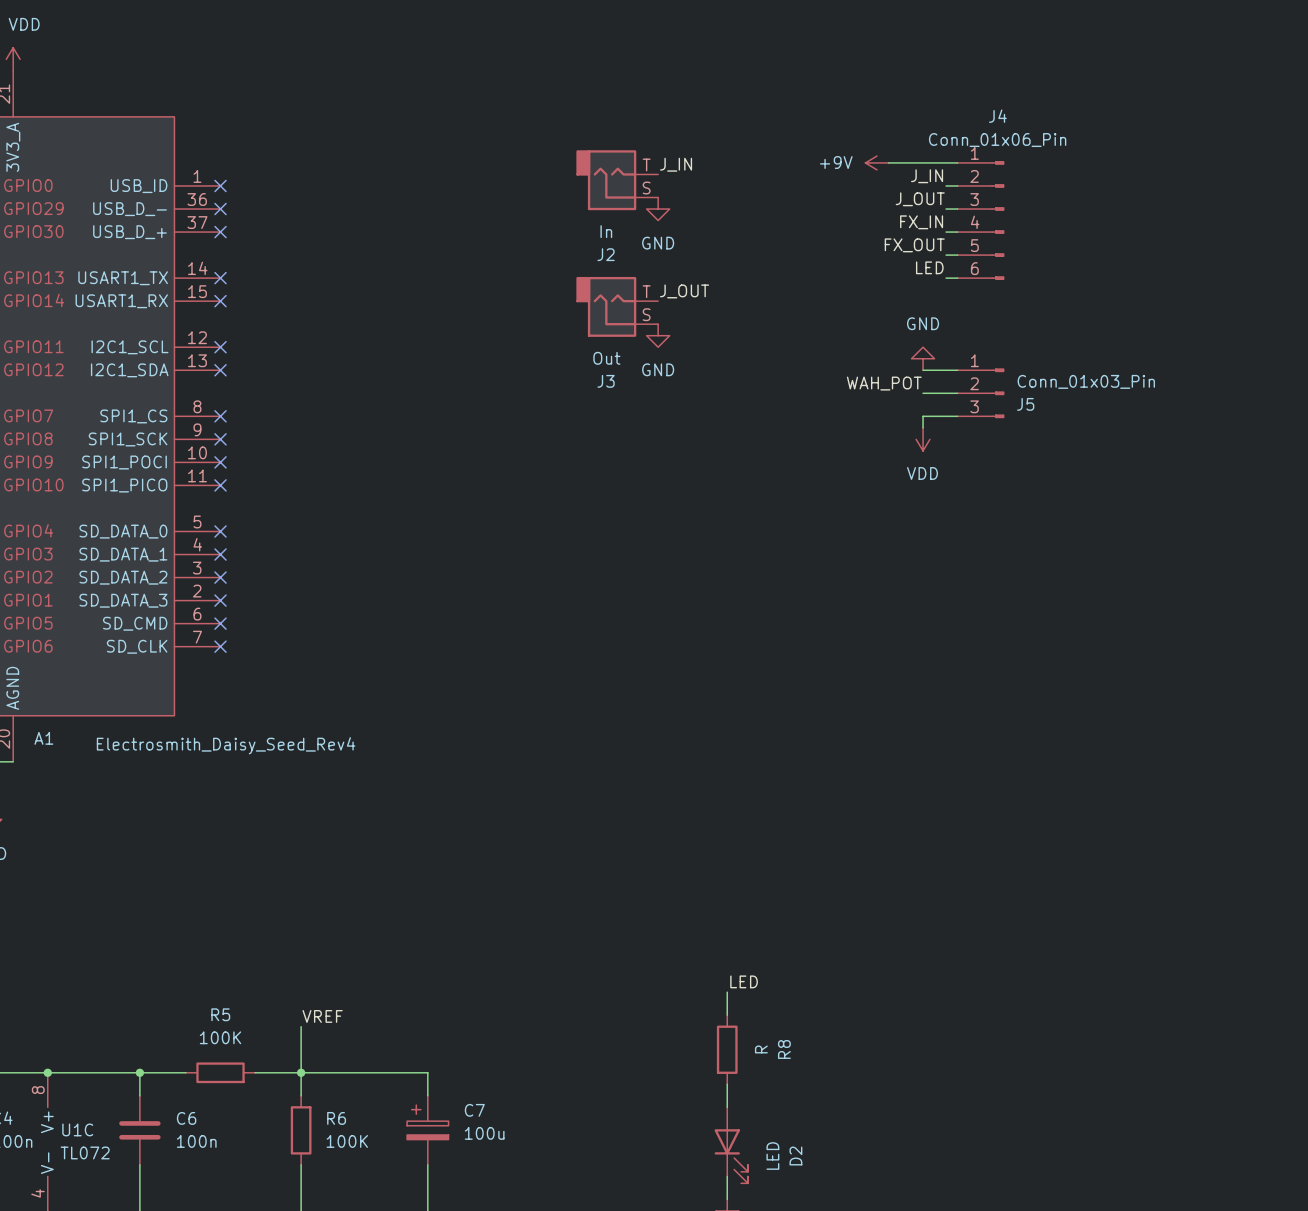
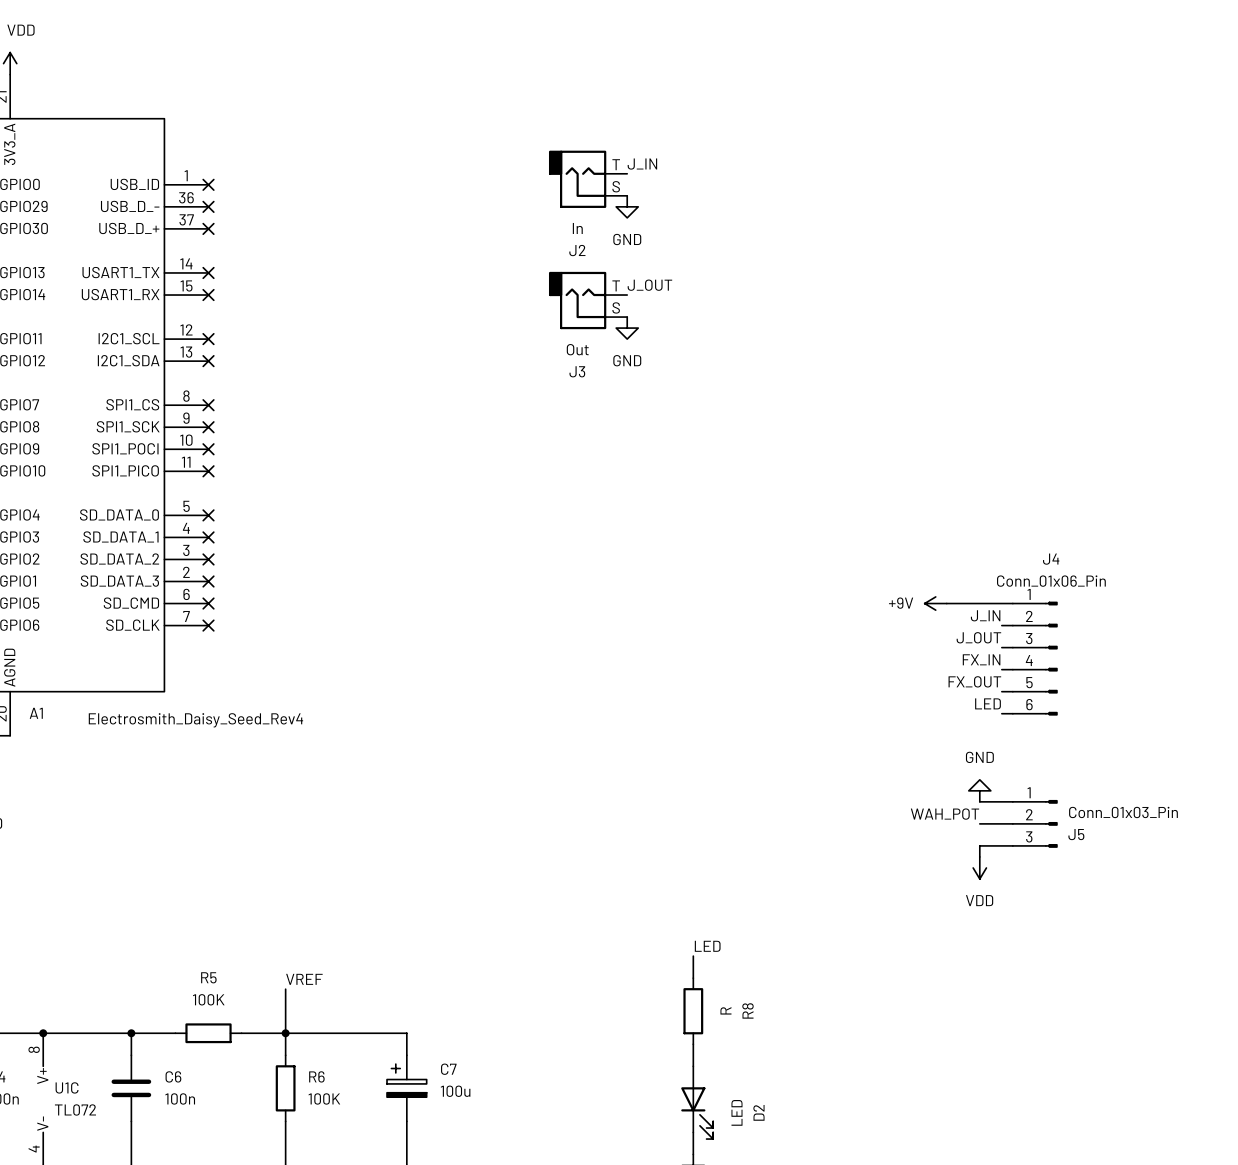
power symbol: +9V (876, 162) -> none
wire: (888, 162) (957, 162) -> none
label: J_IN (927, 176) -> none
wire: (946, 185) (957, 185) -> none
label: J_OUT (920, 199) -> none
wire: (946, 209) (957, 209) -> none
J4 position: (980, 220) -> (1035, 658)
label: FX_IN (921, 222) -> none
wire: (946, 232) (957, 232) -> none
label: FX_OUT (914, 245) -> none
wire: (946, 255) (957, 255) -> none
label: LED (929, 267) -> none
wire: (946, 278) (957, 278) -> none
power symbol: GND (923, 358) -> none
wire: (923, 370) (957, 370) -> none
label: WAH_POT (884, 383) -> none
wire: (923, 393) (957, 393) -> none
J5 position: (980, 393) -> (1035, 823)
wire: (957, 416) (923, 416) (923, 427) -> none
power symbol: VDD (923, 439) -> none
power symbol: none -> +9V (935, 603)
wire: none -> (946, 603) (1012, 603)
label: none -> J_IN (985, 615)
wire: none -> (1001, 625) (1012, 625)
label: none -> J_OUT (978, 637)
wire: none -> (1001, 647) (1012, 647)
label: none -> FX_IN (981, 659)
wire: none -> (1001, 669) (1012, 669)
label: none -> FX_OUT (974, 681)
wire: none -> (1001, 691) (1012, 691)
label: none -> LED (988, 703)
wire: none -> (1001, 713) (1012, 713)
power symbol: none -> GND (979, 790)
wire: none -> (979, 801) (1012, 801)
label: none -> WAH_POT (945, 814)
wire: none -> (979, 823) (1012, 823)
wire: none -> (1012, 845) (979, 845) (979, 856)
power symbol: none -> VDD (979, 867)

